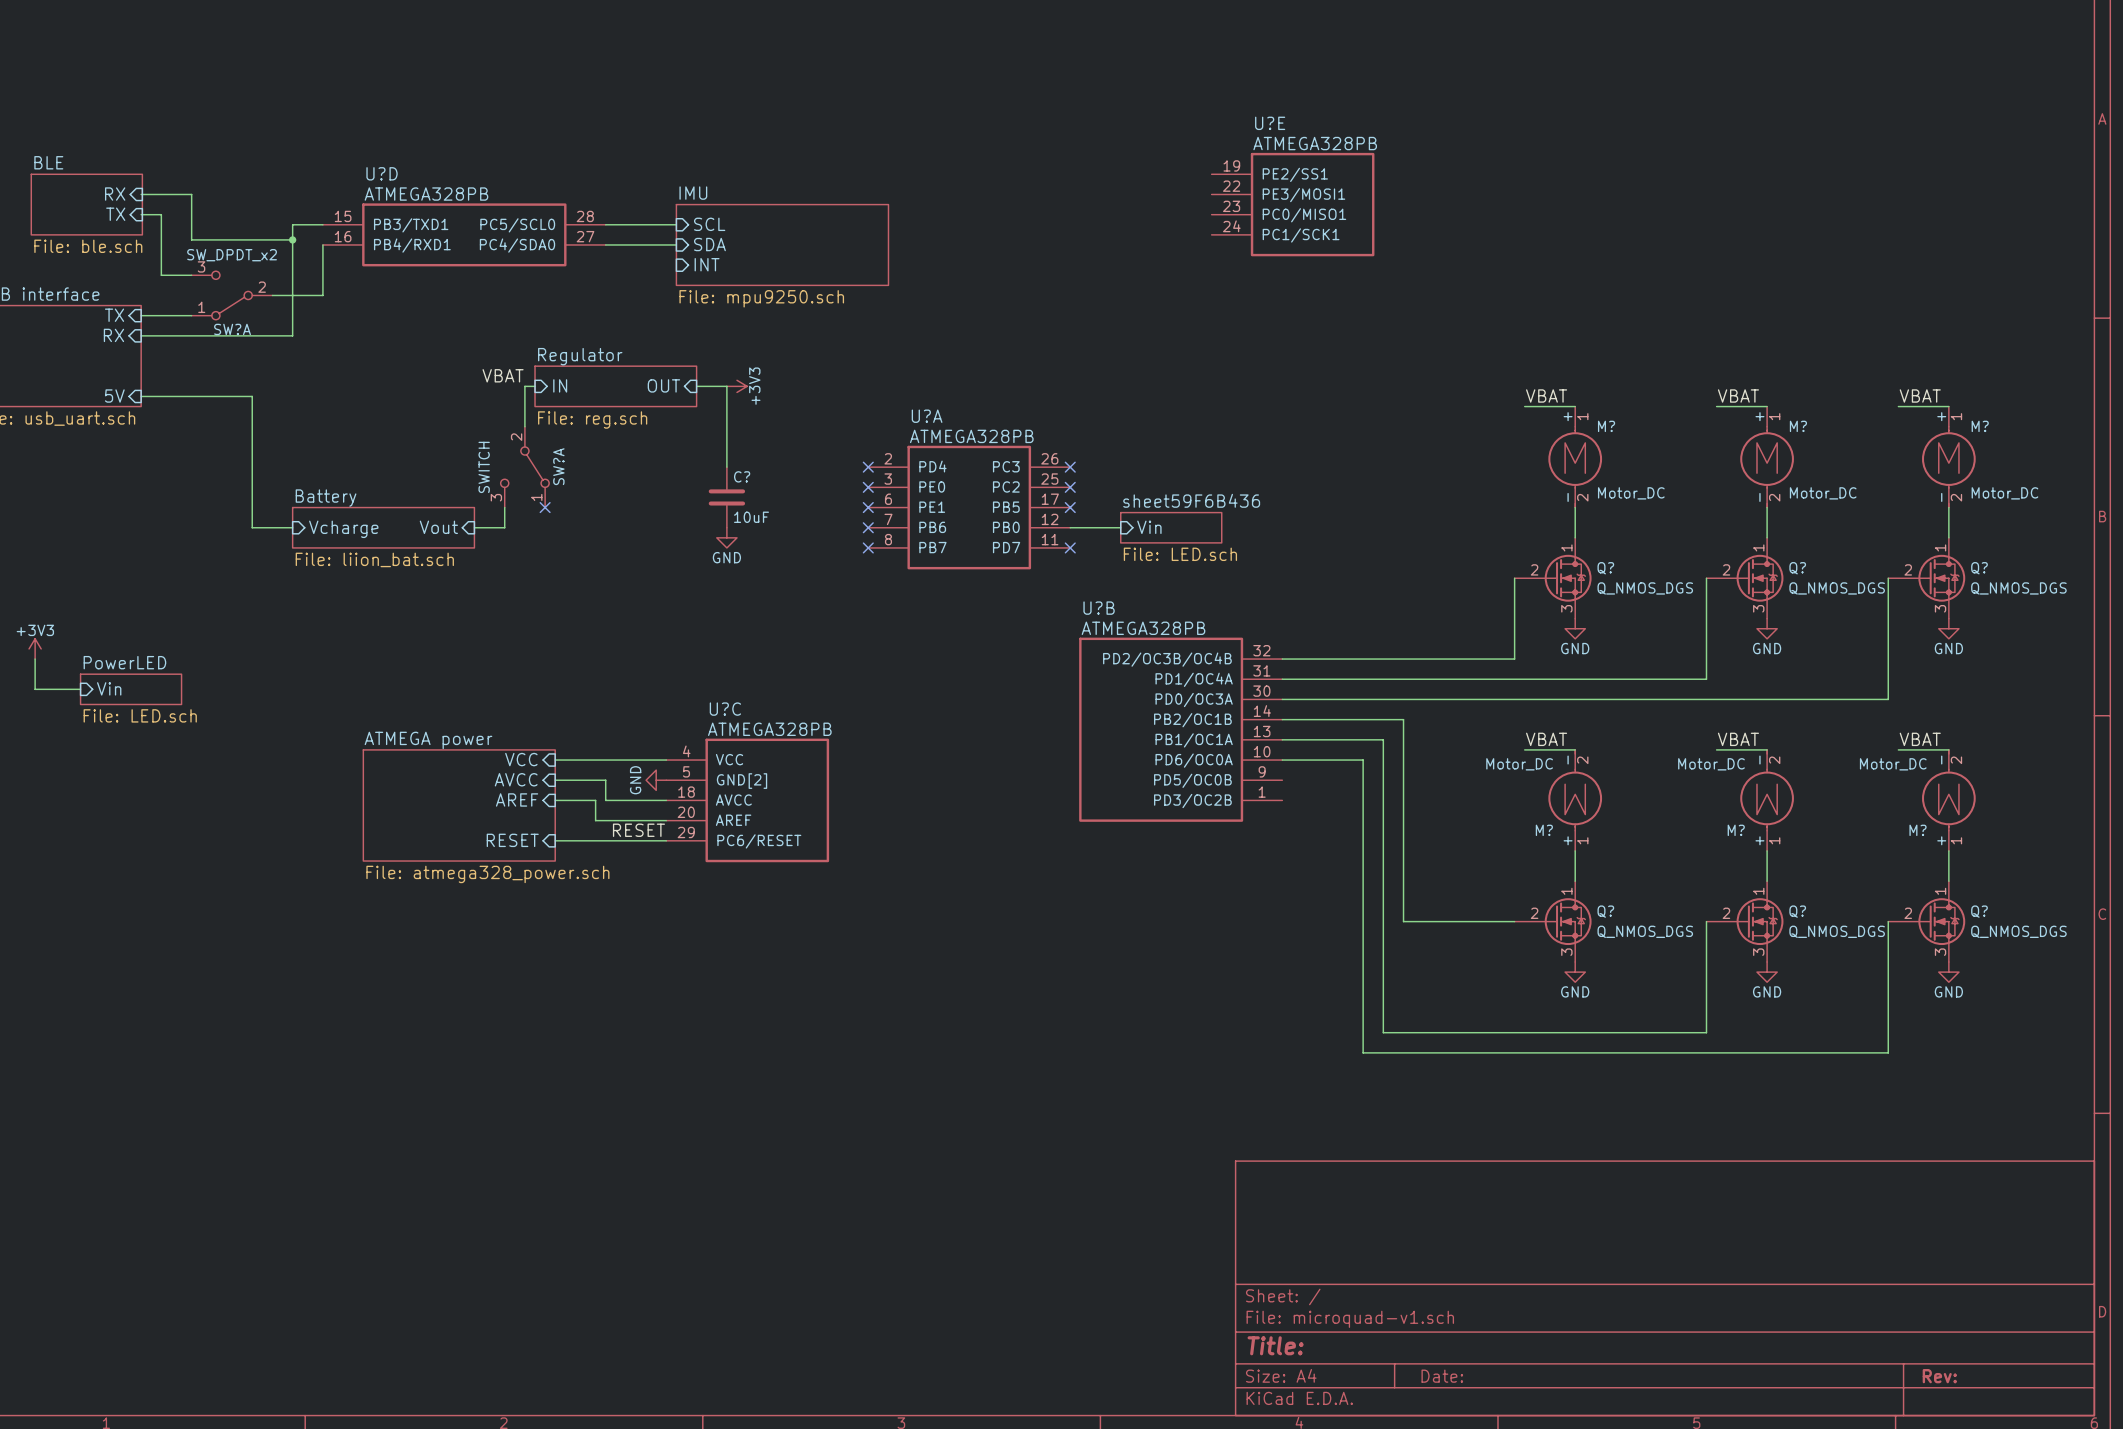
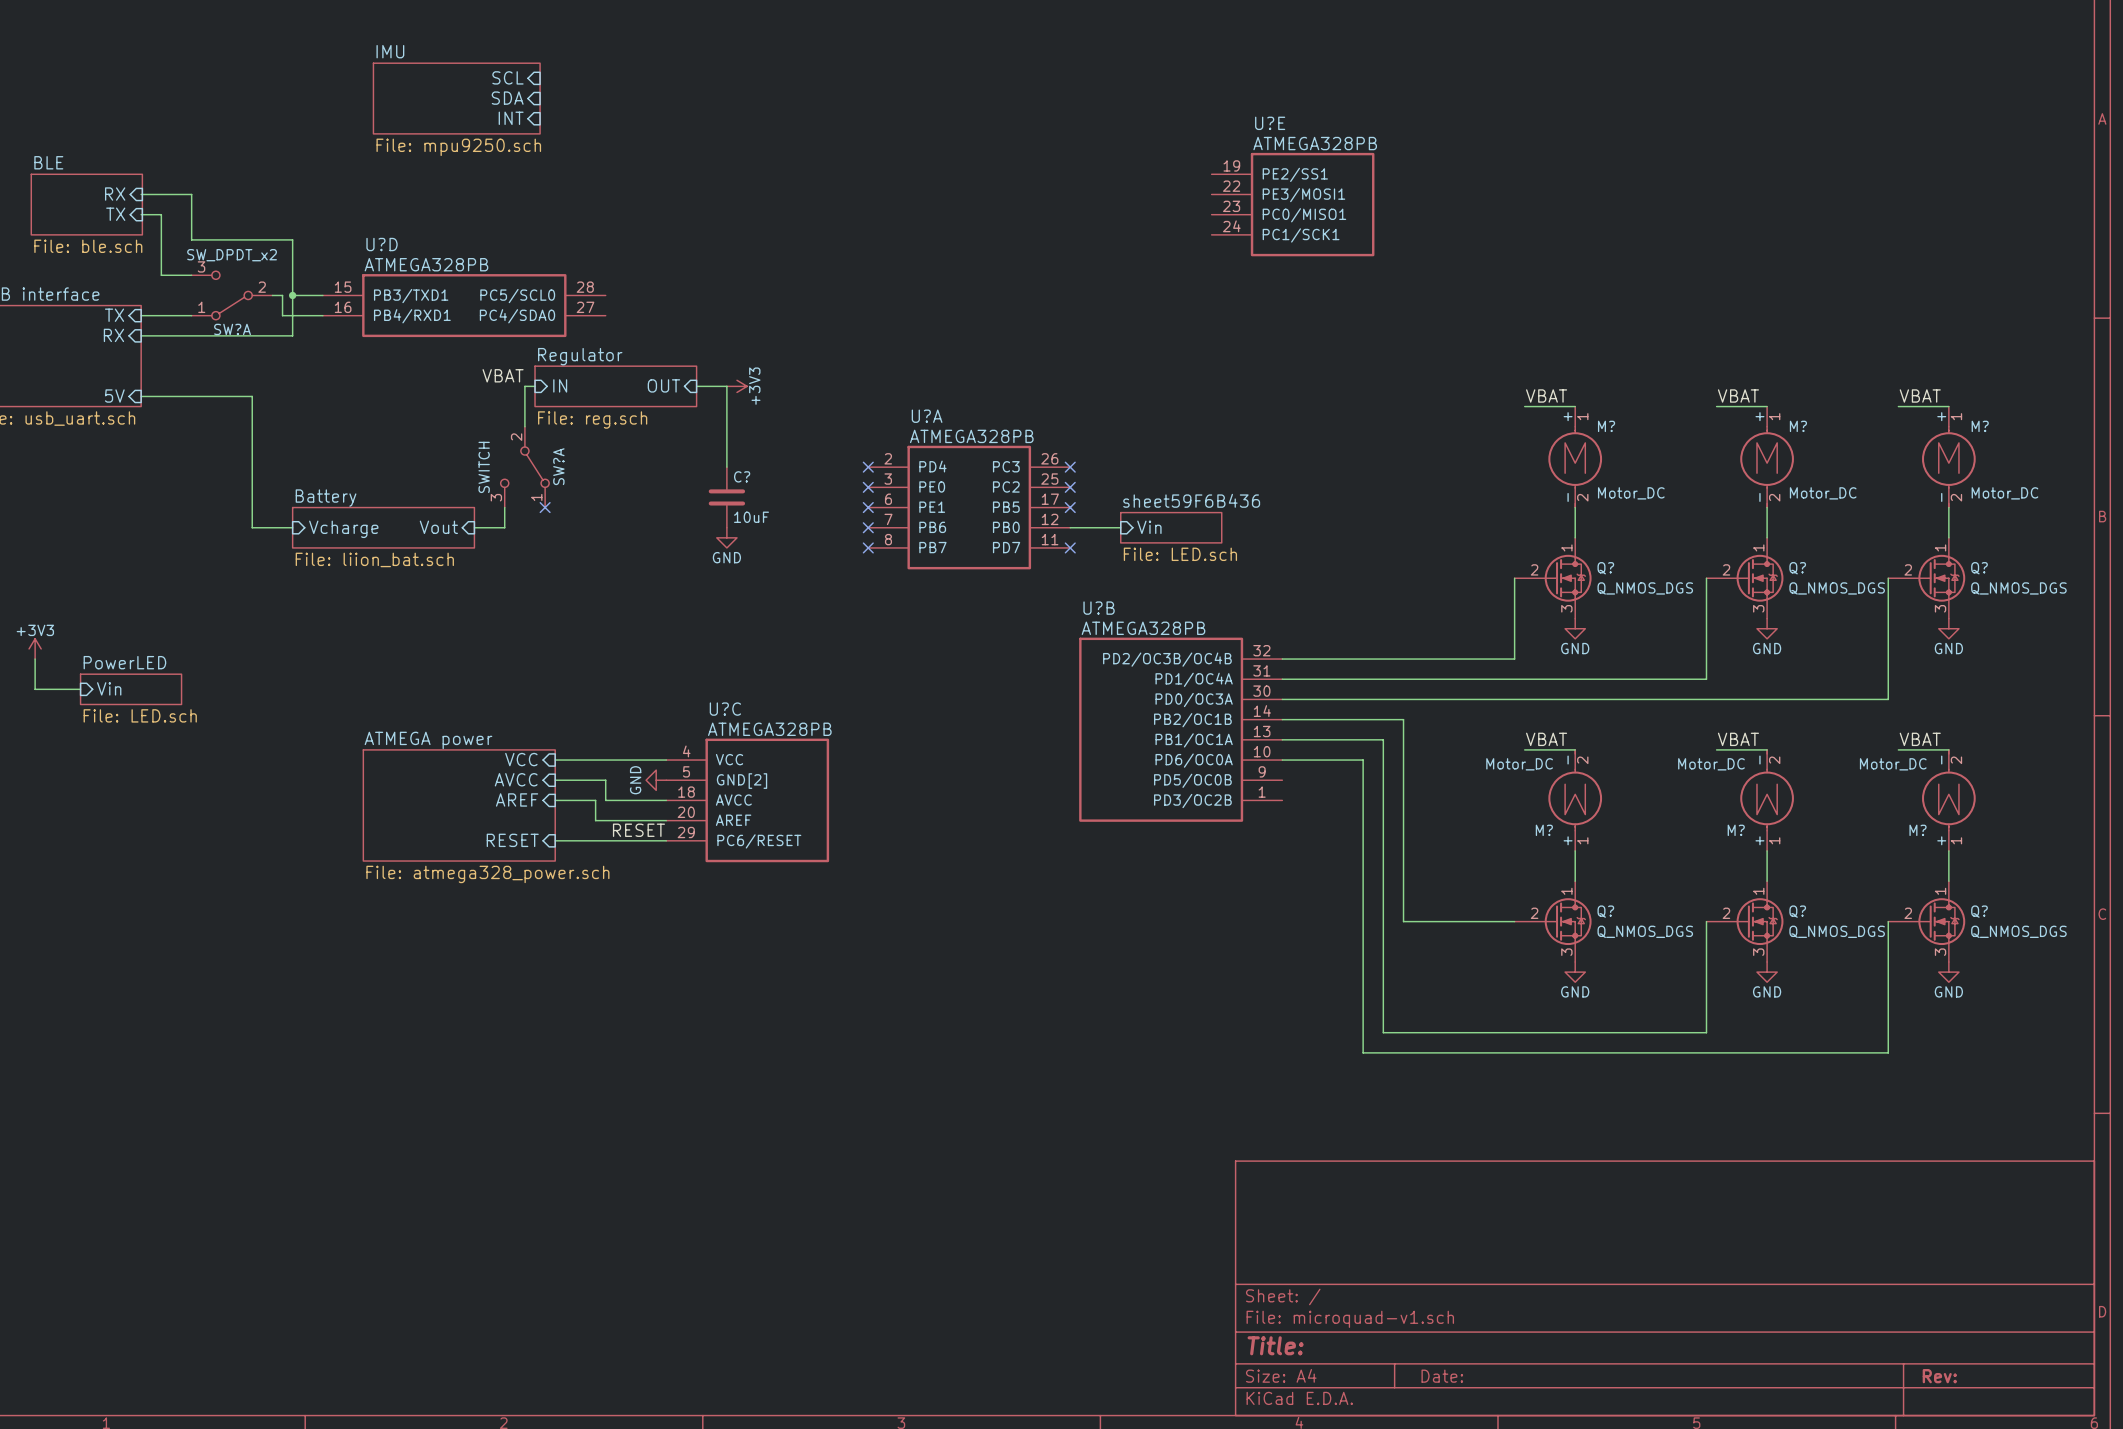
sheet pin: none -> SCL (507, 77)
sheet IMU: none -> File: mpu9250.sch (456, 98)
sheet pin: none -> SDA (507, 98)
sheet pin: none -> INT (511, 118)
wire: (322, 224) (292, 224) (292, 239) -> none
wire: (605, 224) (676, 224) -> none
sheet pin: SCL (709, 224) -> none
U?D position: (464, 234) -> (464, 305)
junction: (292, 239) -> none
wire: (322, 244) (322, 295) -> none
wire: (605, 244) (676, 244) -> none
sheet pin: SDA (709, 244) -> none
sheet IMU: File: mpu9250.sch (782, 244) -> none
sheet pin: INT (707, 264) -> none
wire: (282, 295) (292, 295) -> (282, 295) (282, 315) (322, 315)
junction: none -> (292, 295)

